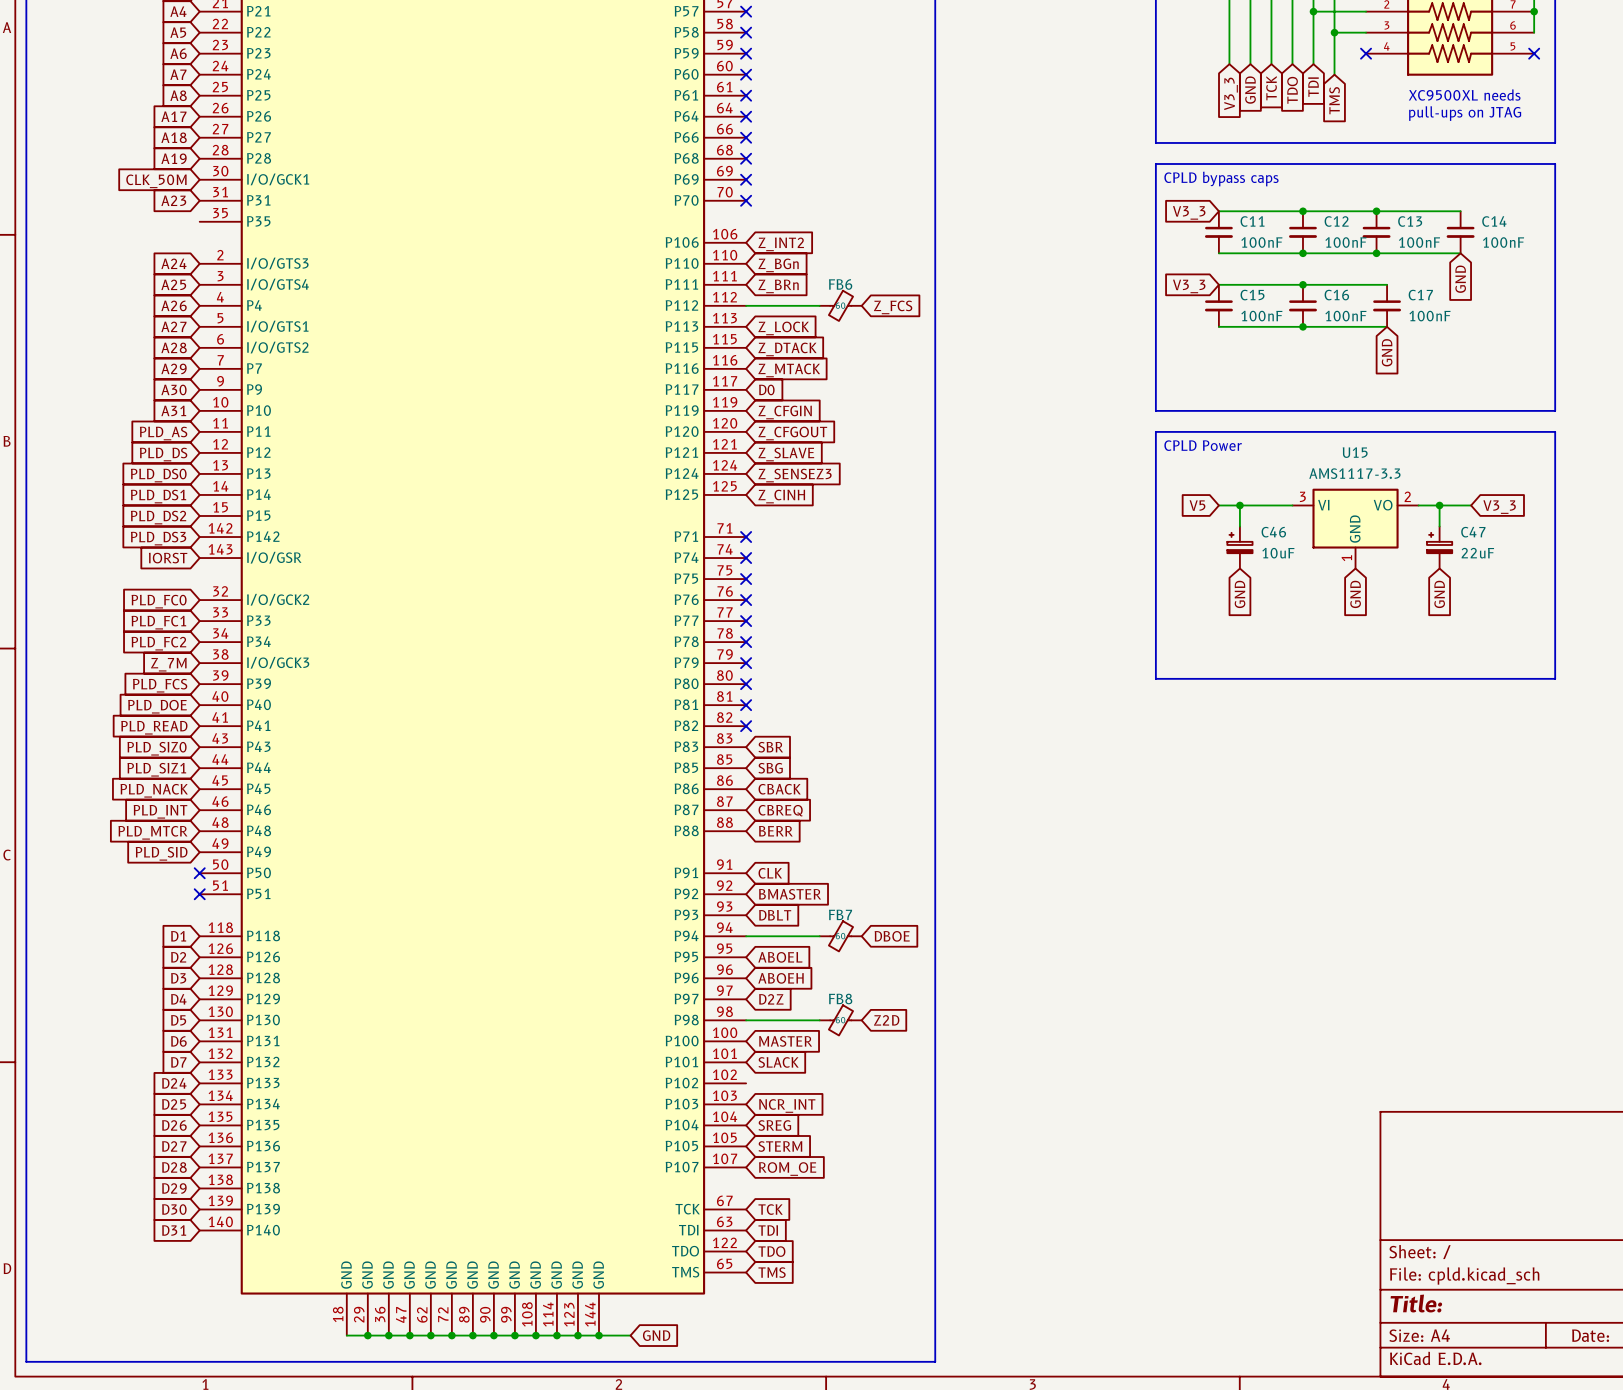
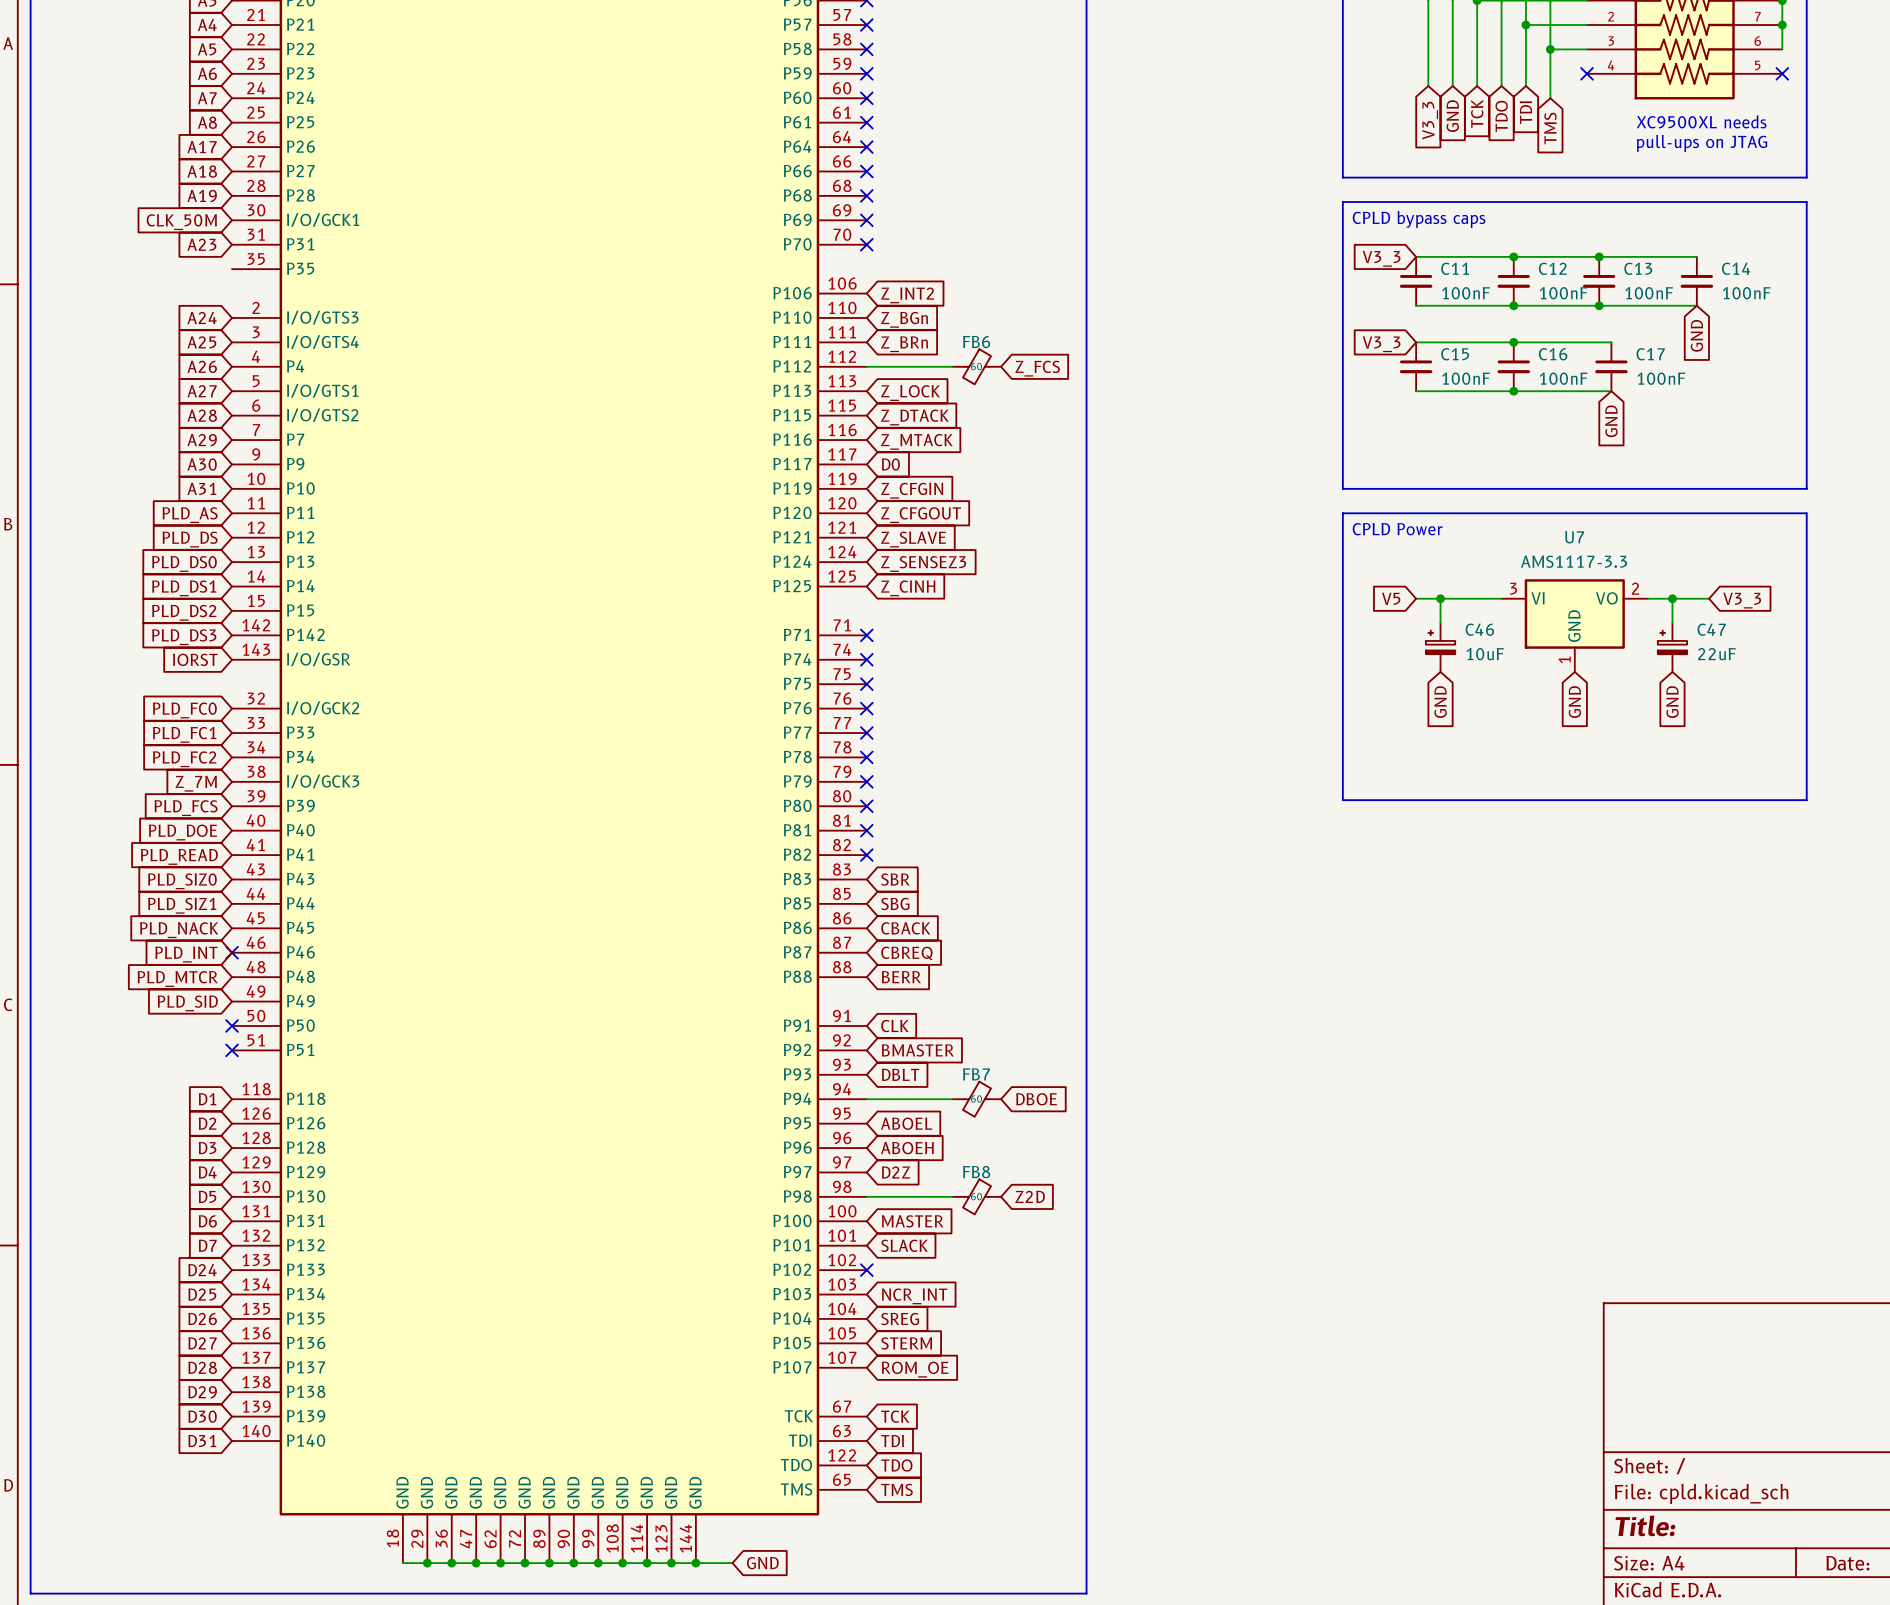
U15 name: U15 (1355, 452) -> U7 (1574, 537)
no-connect mark: none -> (232, 952)
no-connect mark: none -> (866, 1270)

